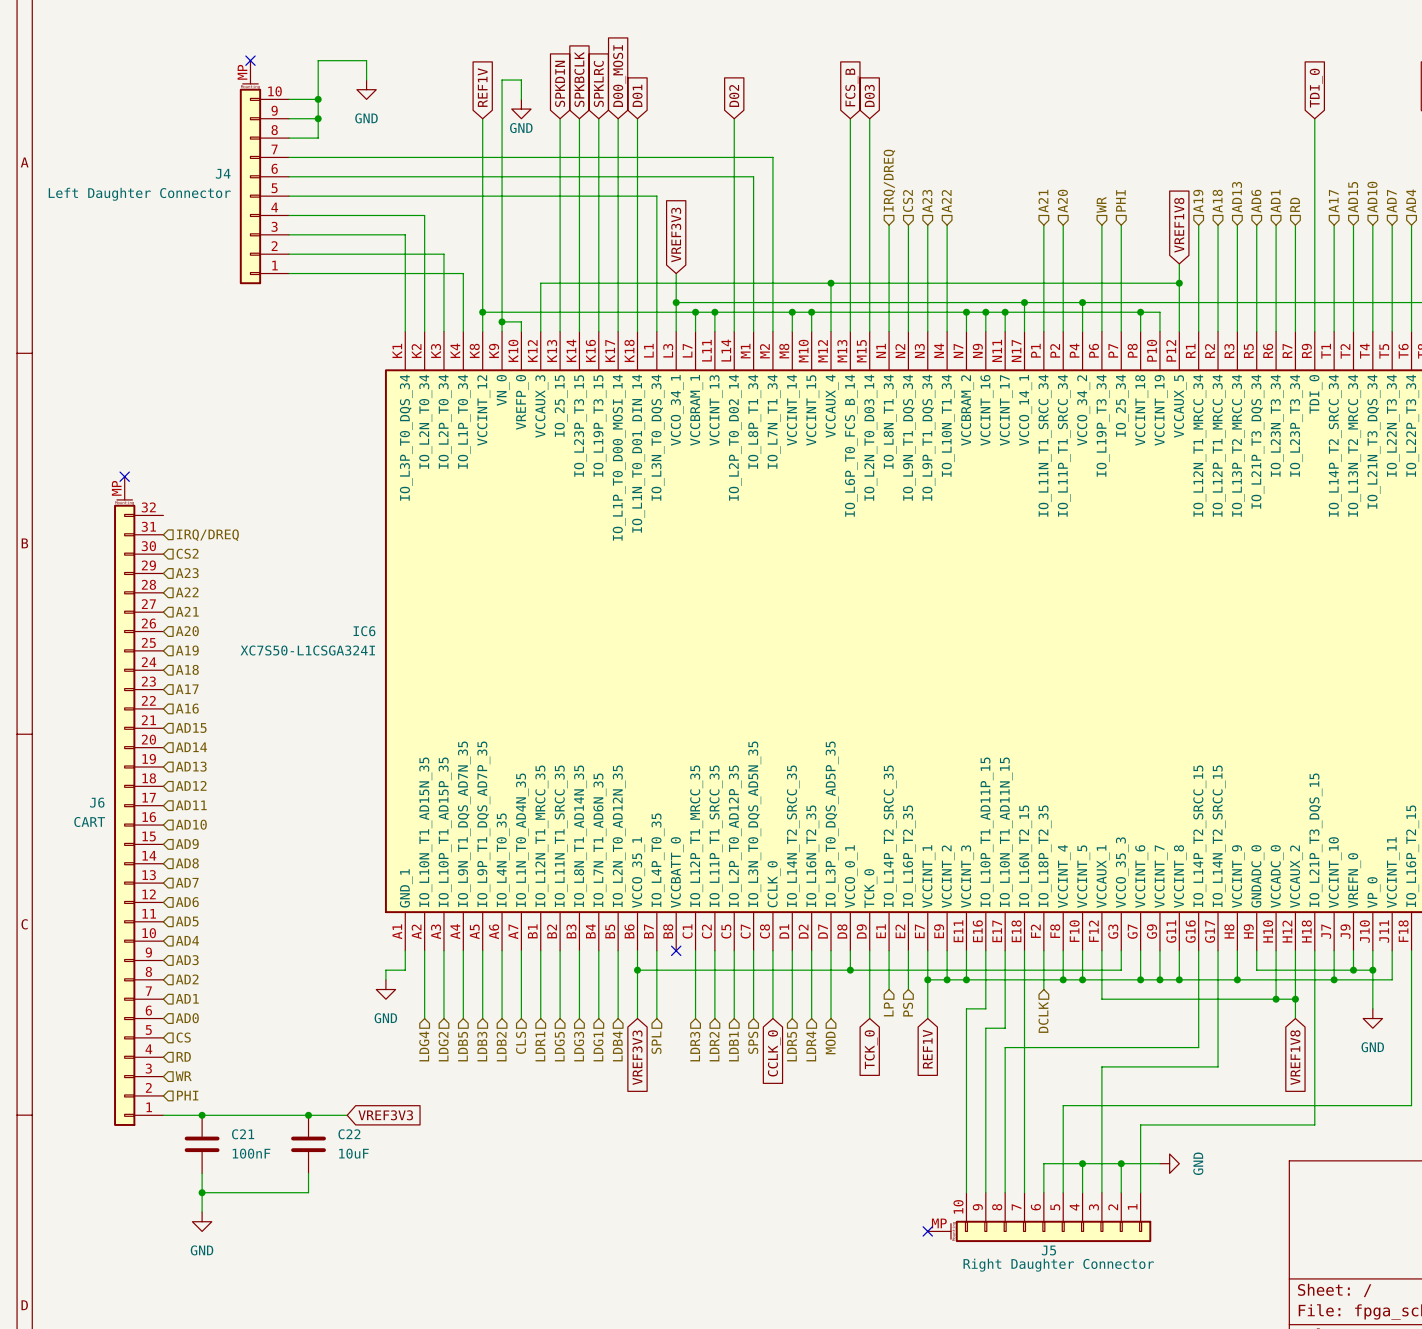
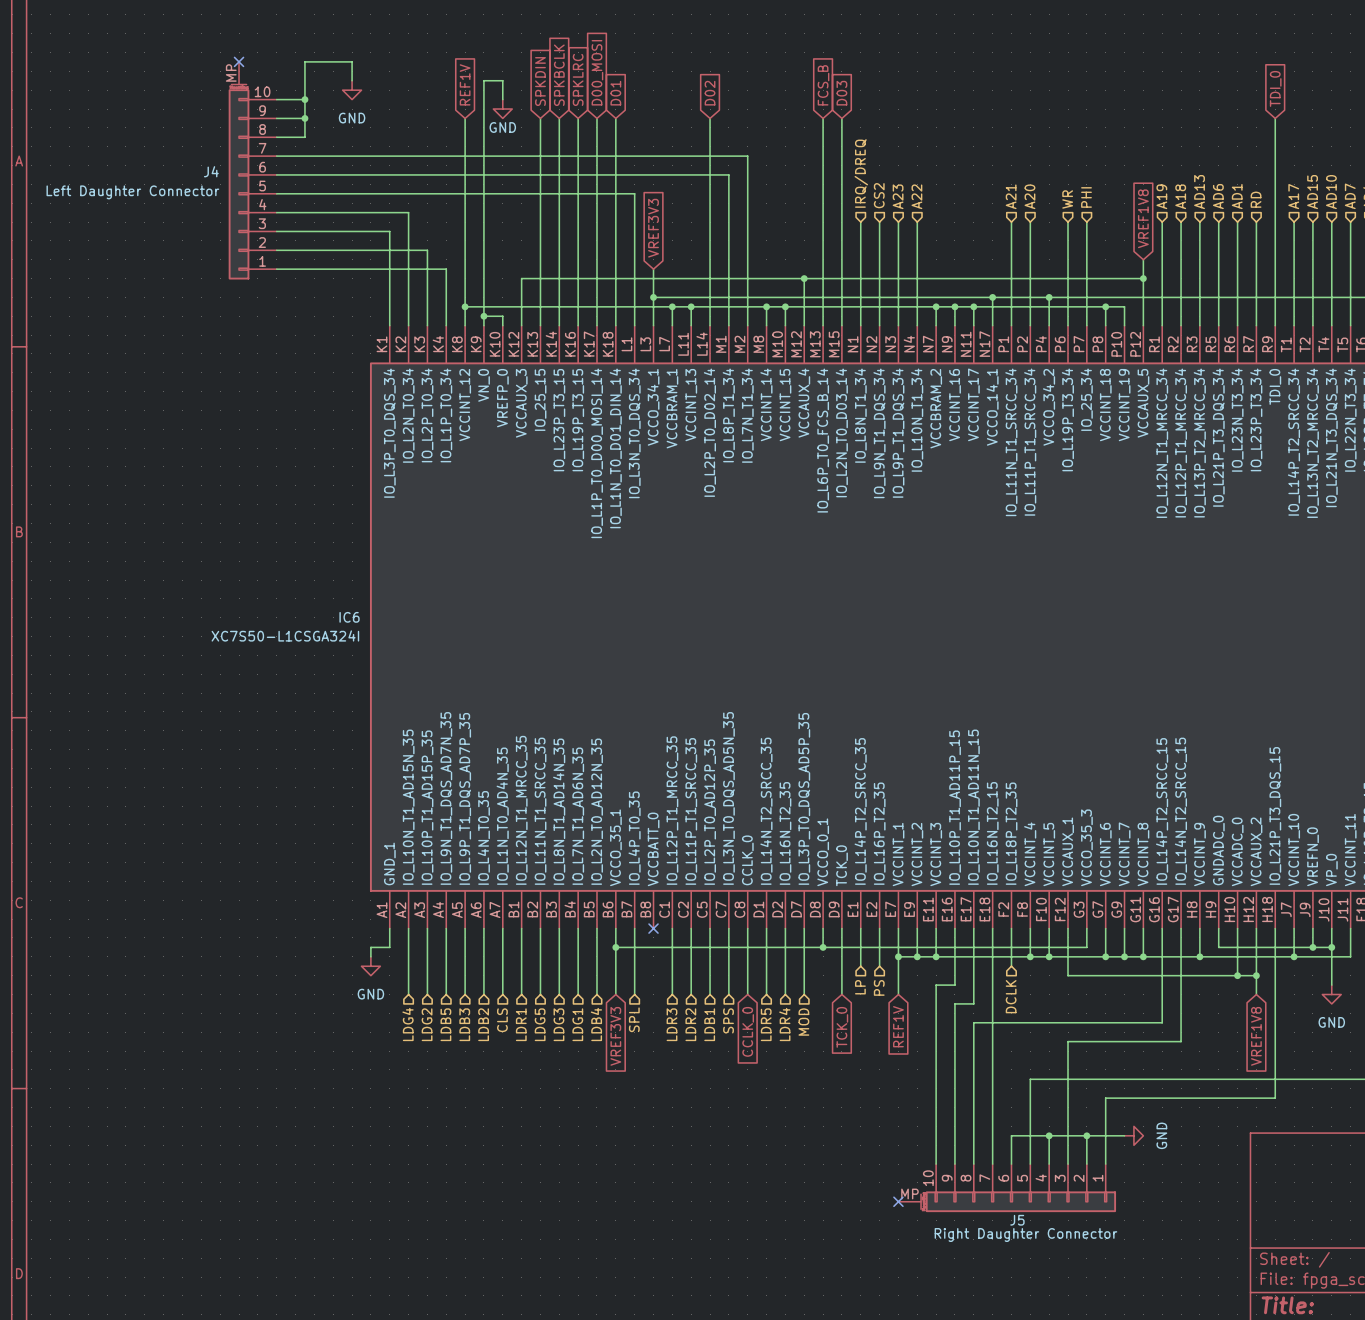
no-connect mark: (124, 476) -> none
hierarchical label: IRQ/DREQ (207, 535) -> none
hierarchical label: CS2 (187, 553) -> none
hierarchical label: A23 (187, 573) -> none
hierarchical label: A22 (187, 592) -> none
hierarchical label: A21 (187, 611) -> none
hierarchical label: A20 (187, 631) -> none
hierarchical label: A19 (187, 650) -> none
hierarchical label: A18 (187, 669) -> none
hierarchical label: A17 (187, 689) -> none
hierarchical label: A16 (187, 708) -> none
hierarchical label: AD15 (191, 728) -> none
hierarchical label: AD14 (191, 747) -> none
hierarchical label: AD13 (191, 766) -> none
hierarchical label: AD12 (191, 785) -> none
J6: CART (138, 801) -> none
hierarchical label: AD11 (191, 805) -> none
hierarchical label: AD10 (191, 824) -> none
hierarchical label: AD9 (187, 844) -> none
hierarchical label: AD8 (187, 863) -> none
hierarchical label: AD7 (187, 882) -> none
hierarchical label: AD6 (187, 902) -> none
hierarchical label: AD5 (187, 921) -> none
hierarchical label: AD4 (187, 940) -> none
hierarchical label: AD3 (187, 960) -> none
hierarchical label: AD2 (187, 979) -> none
hierarchical label: AD1 (187, 998) -> none
hierarchical label: AD0 (187, 1018) -> none
hierarchical label: CS (183, 1037) -> none
hierarchical label: RD (183, 1056) -> none
hierarchical label: WR (183, 1076) -> none
hierarchical label: PHI (187, 1095) -> none
wire: (163, 1115) (347, 1115) -> none
junction: (202, 1115) -> none
junction: (308, 1115) -> none
global label: VREF3V3 (385, 1115) -> none
C21: 100nF (202, 1144) -> none
C22: 10uF (308, 1144) -> none
wire: (202, 1173) (202, 1212) -> none
wire: (308, 1173) (308, 1192) (202, 1192) -> none
junction: (202, 1192) -> none
power symbol: GND (202, 1221) -> none

